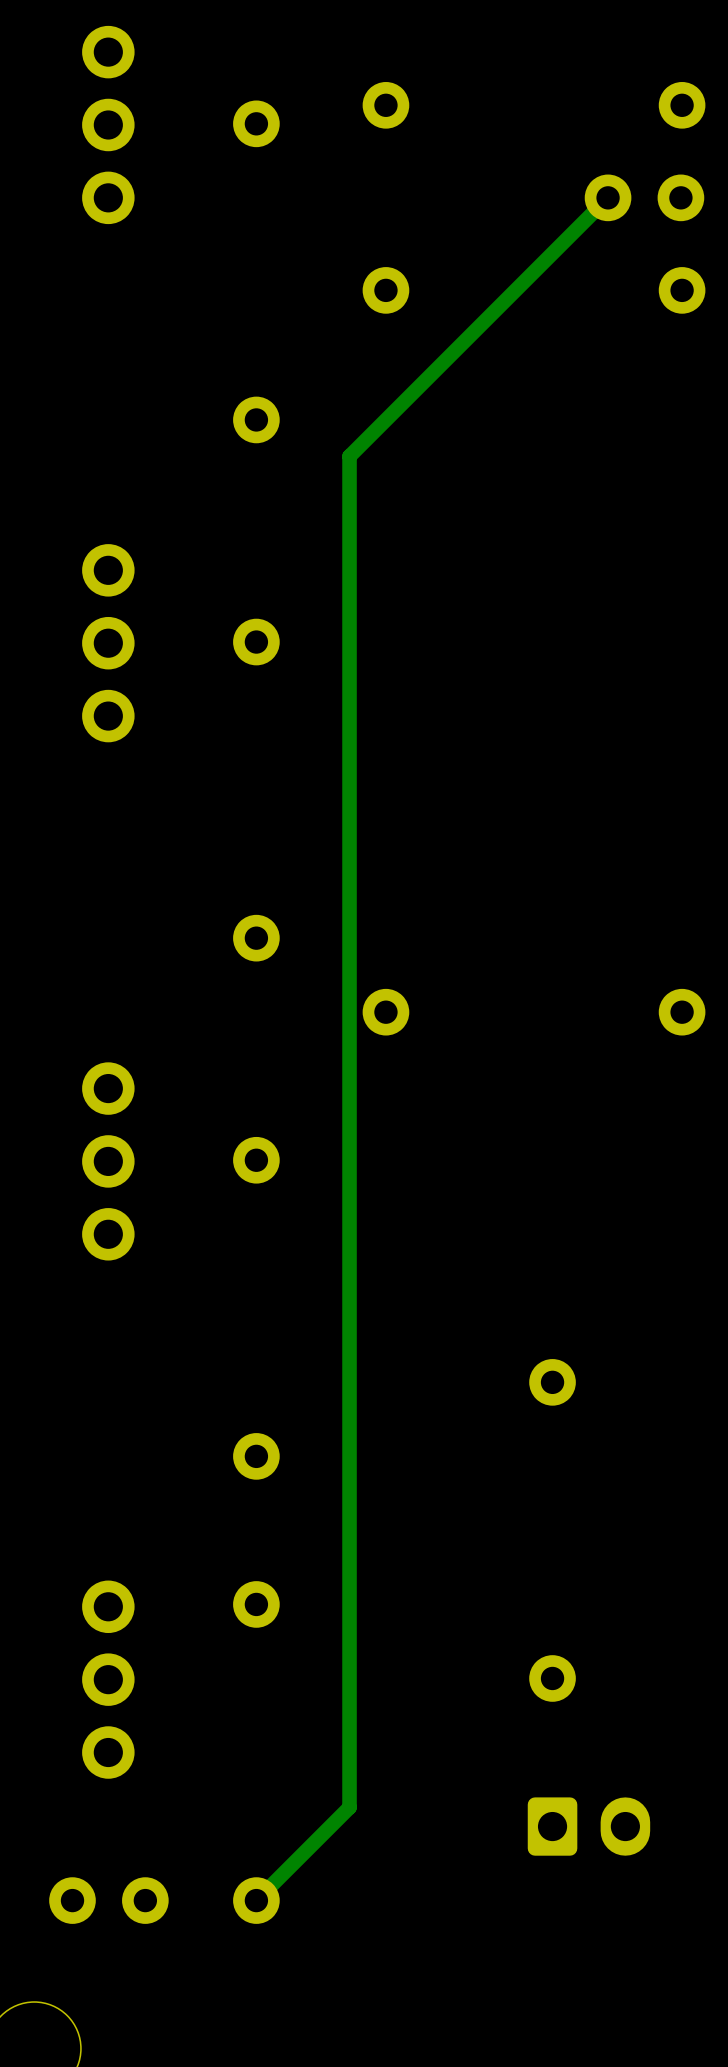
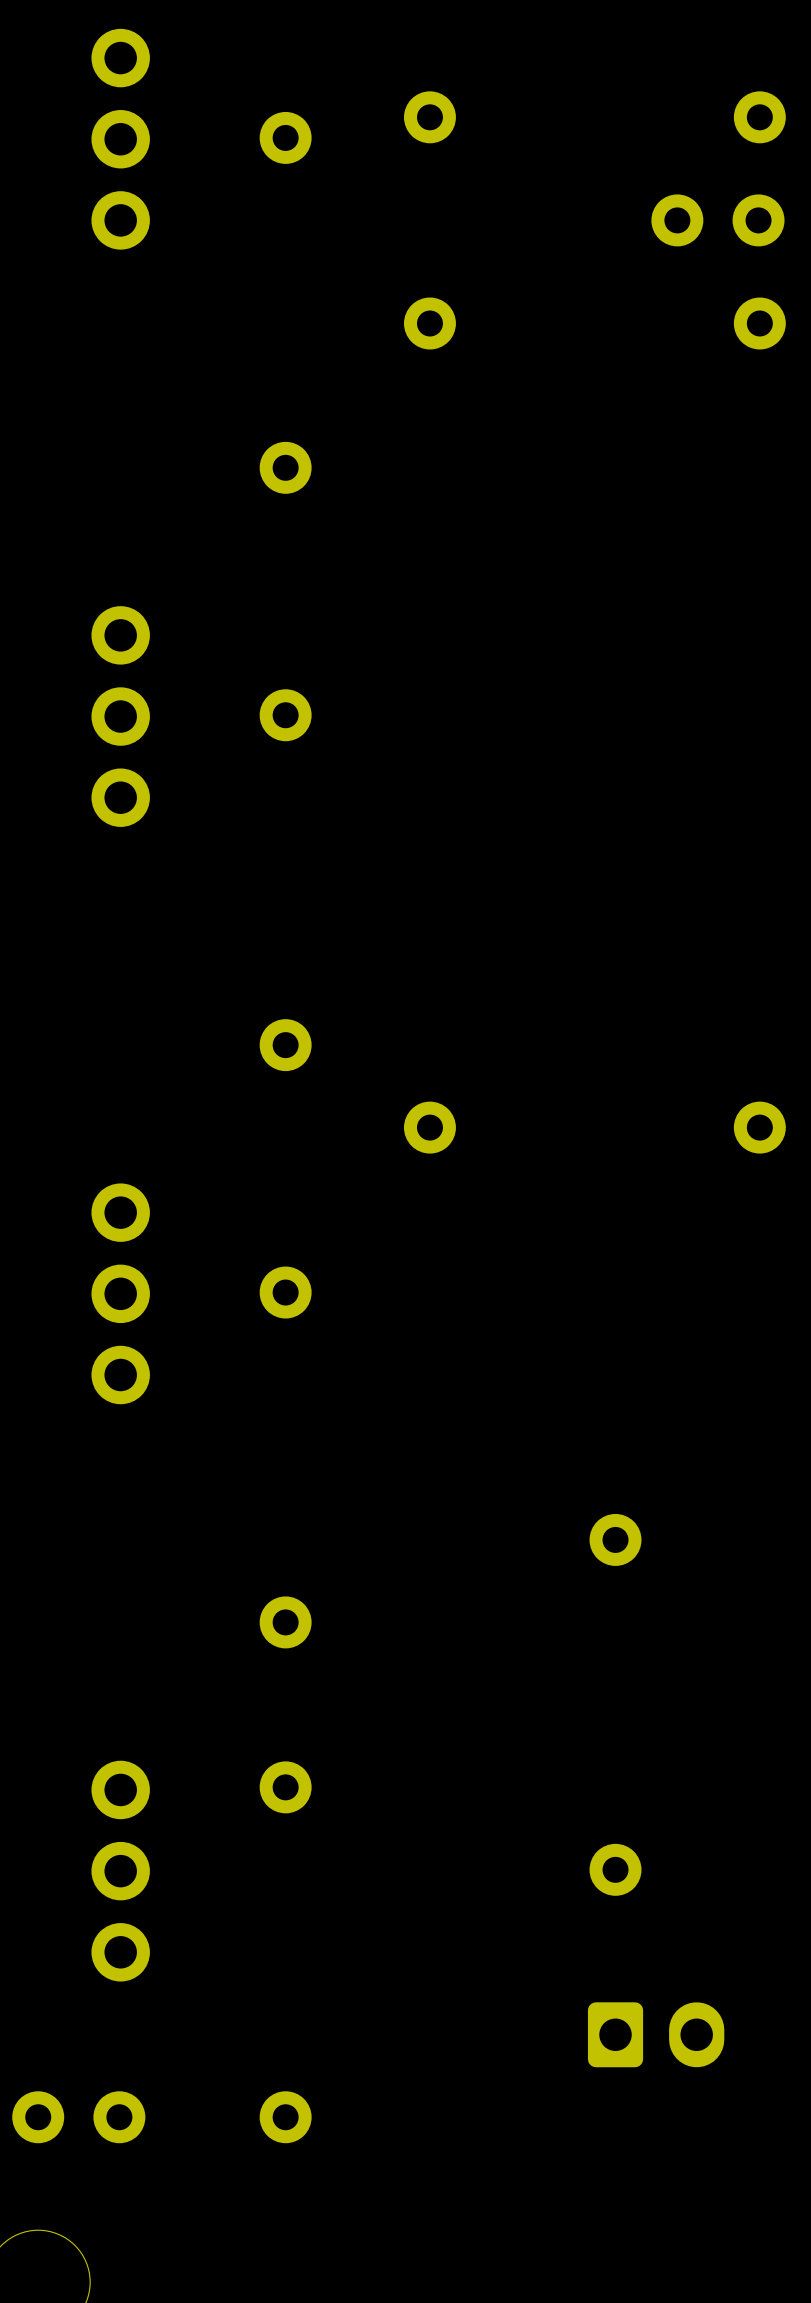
track: (608, 197) (349, 456) (349, 1807) (256, 1900) -> none
part position: (108, 1900) -> (78, 2117)

